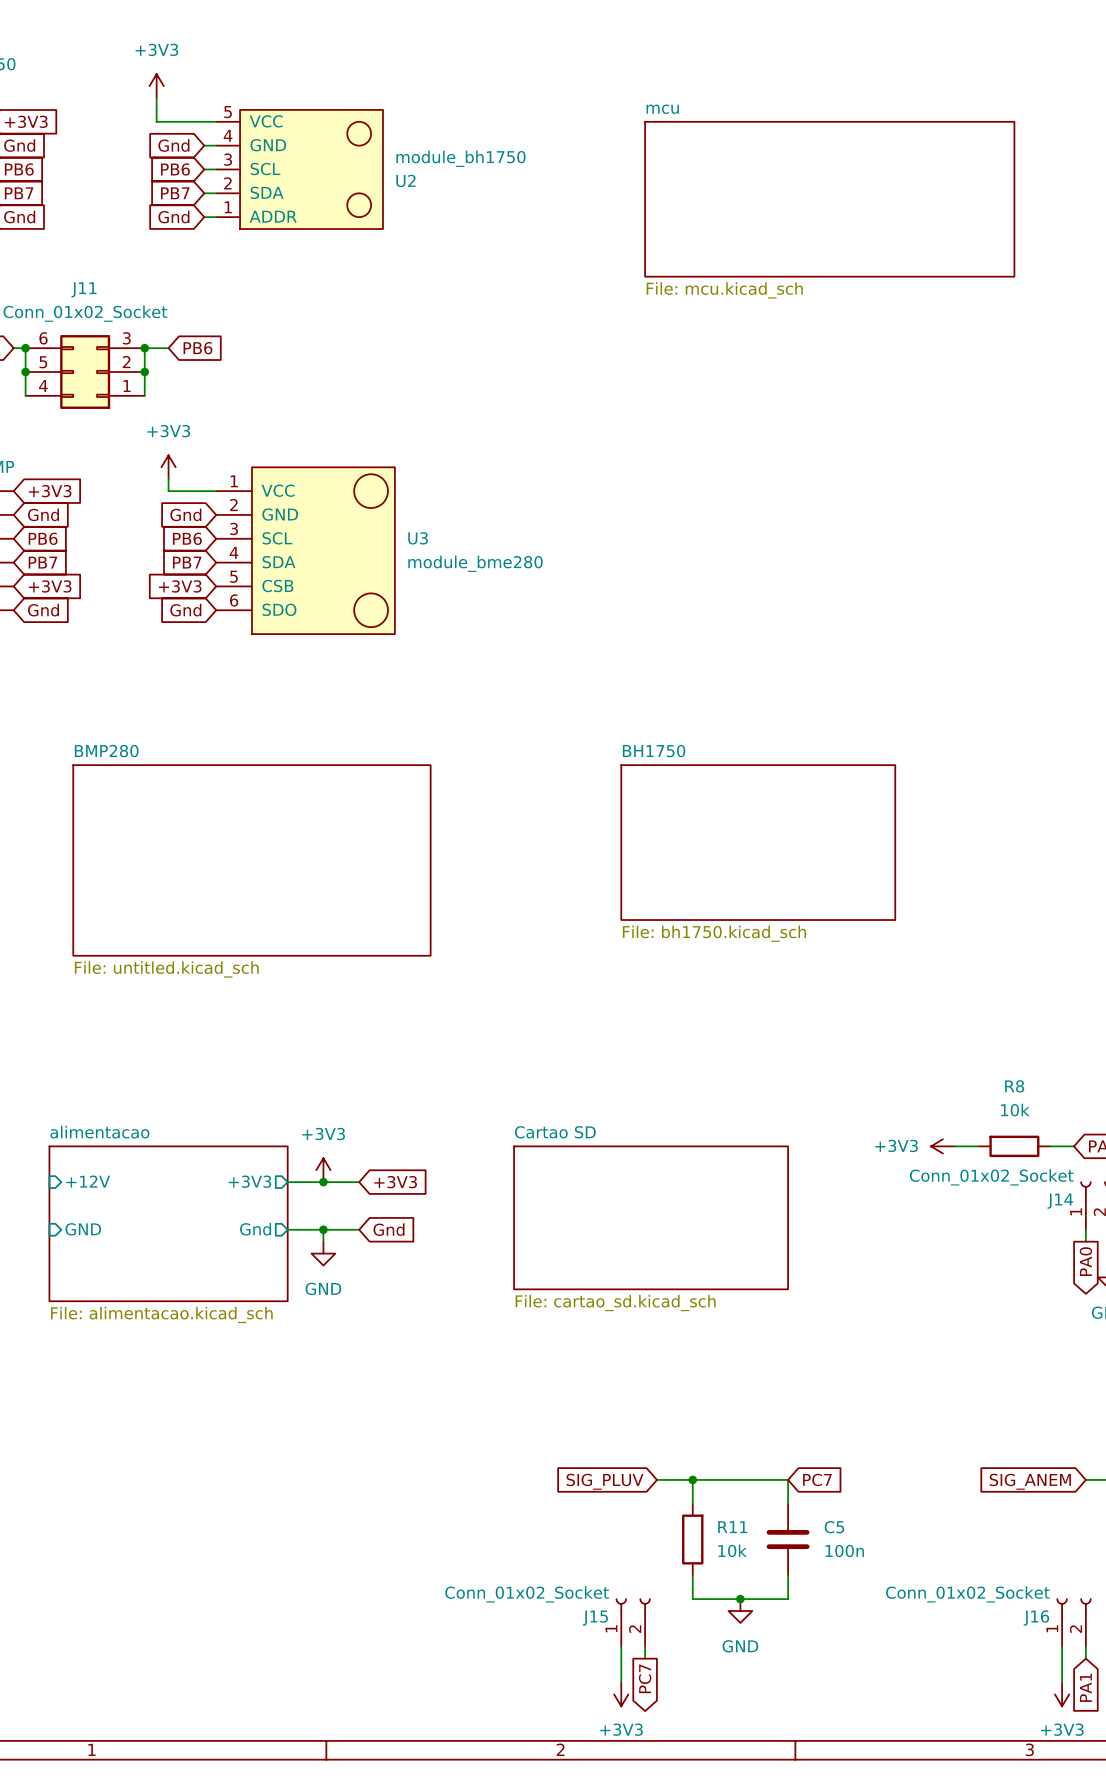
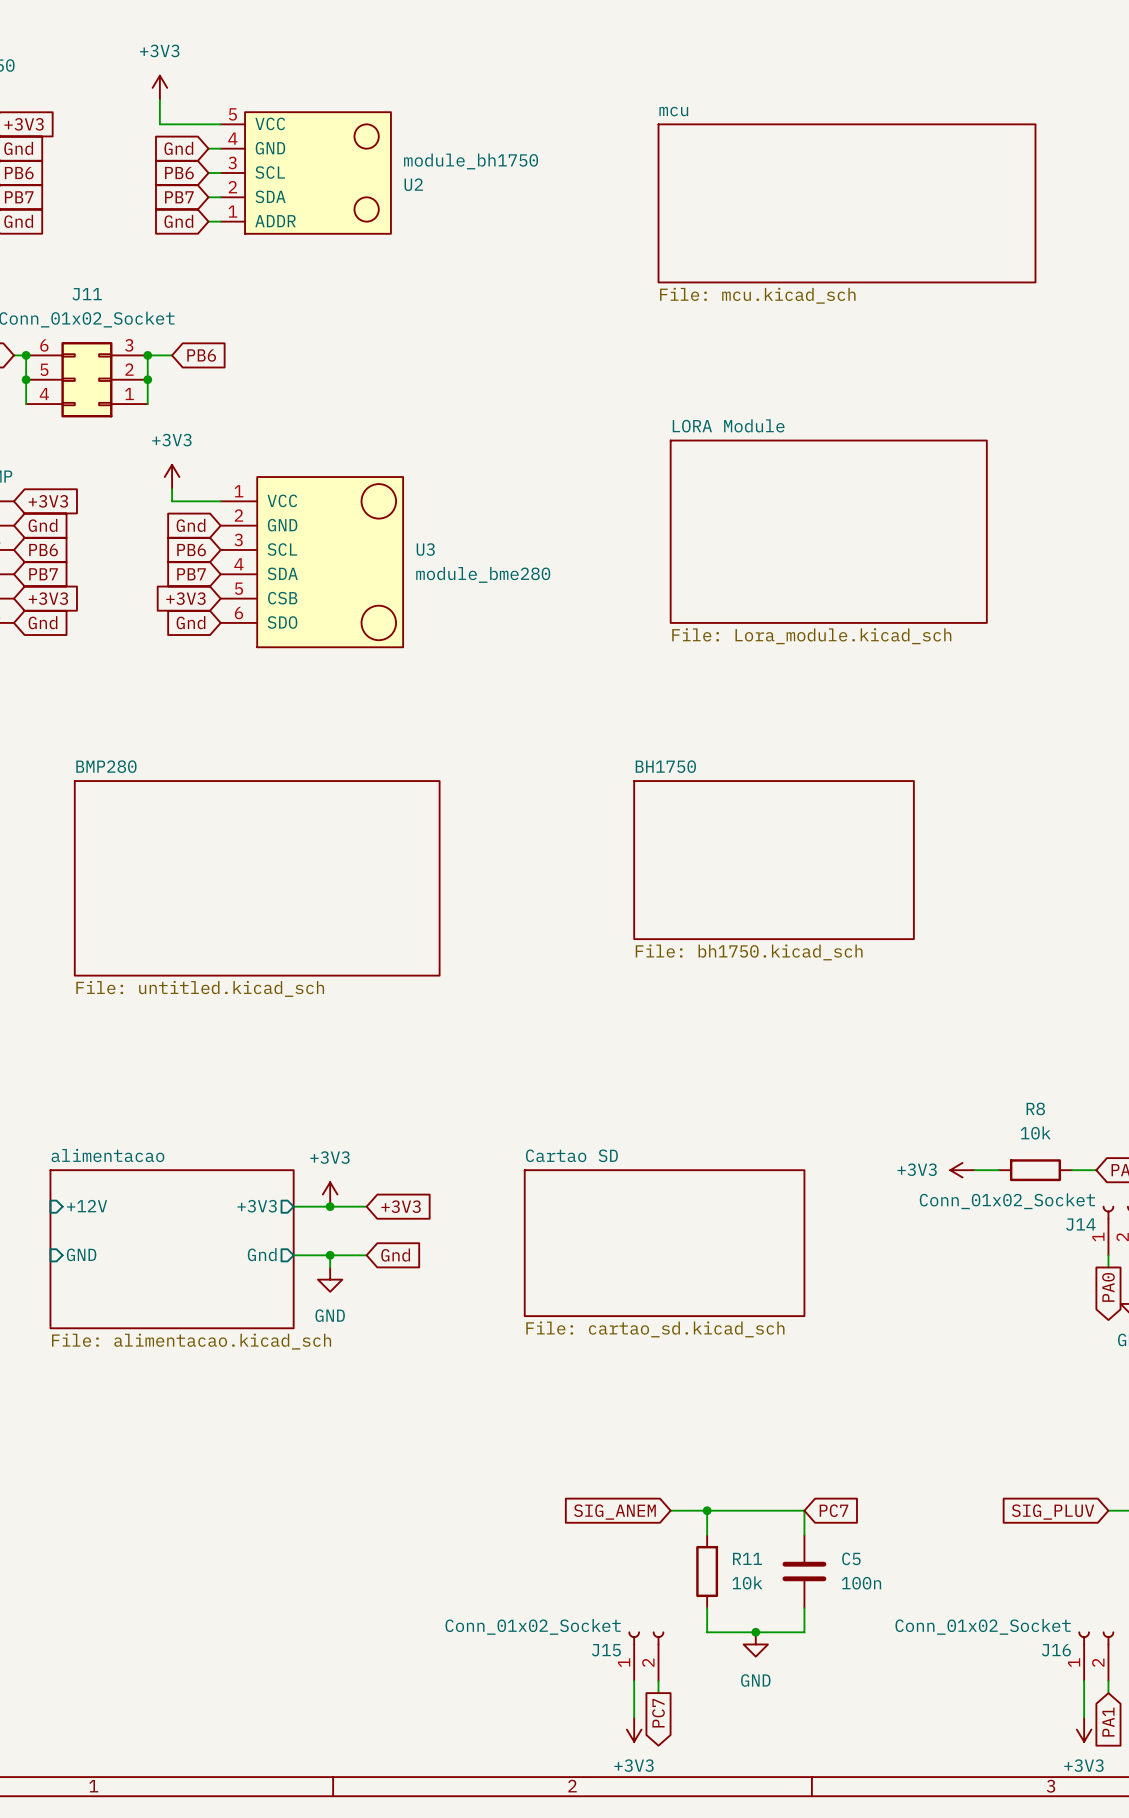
sheet LORA Module: none -> File: Lora_module.kicad_sch (828, 531)
global label: SIG_PLUV (605, 1481) -> SIG_ANEM (614, 1512)
global label: SIG_ANEM (1030, 1481) -> SIG_PLUV (1053, 1512)

